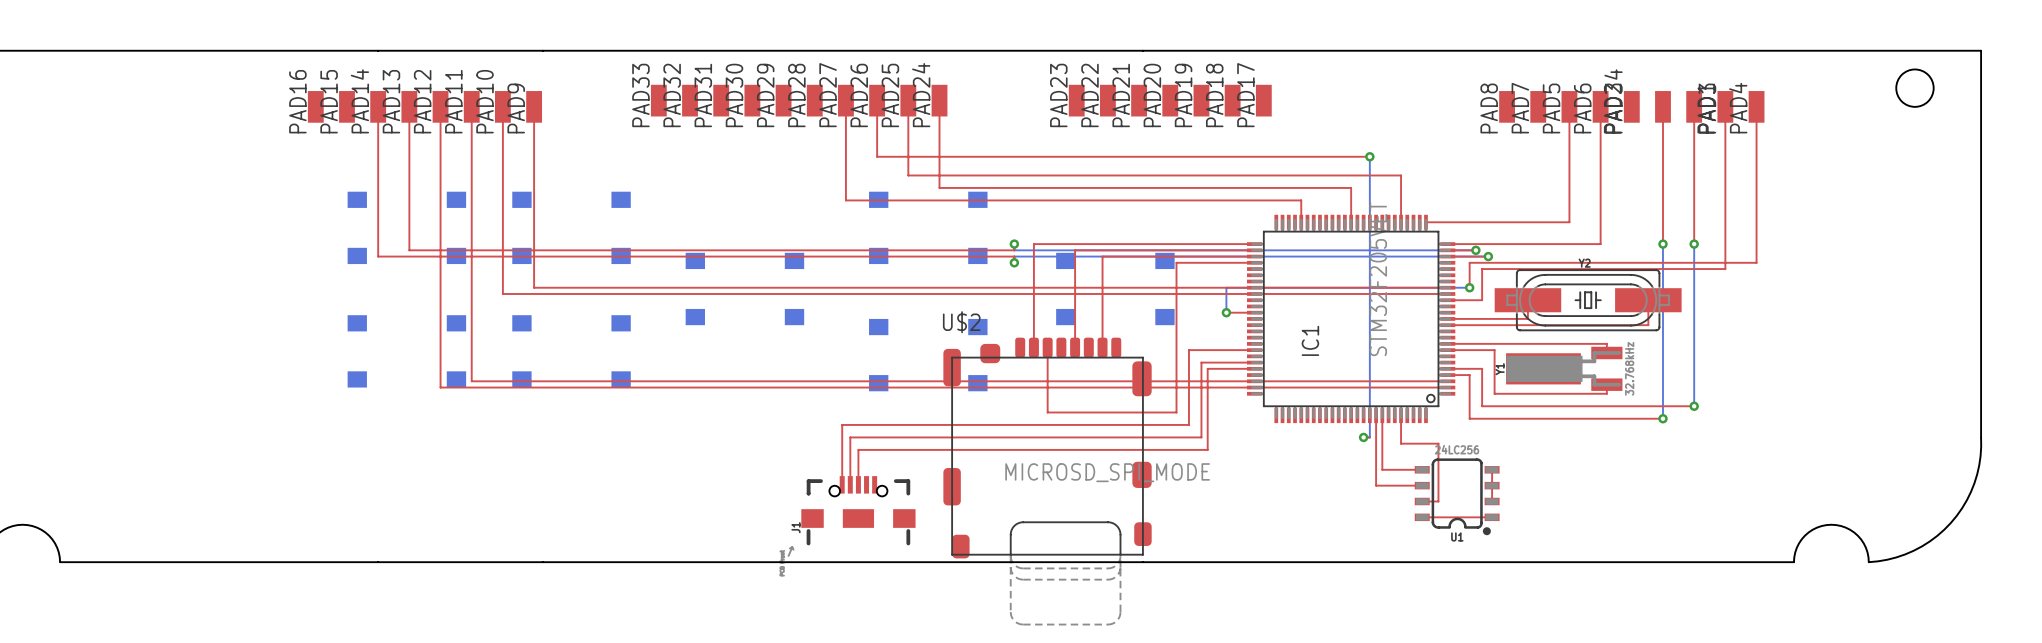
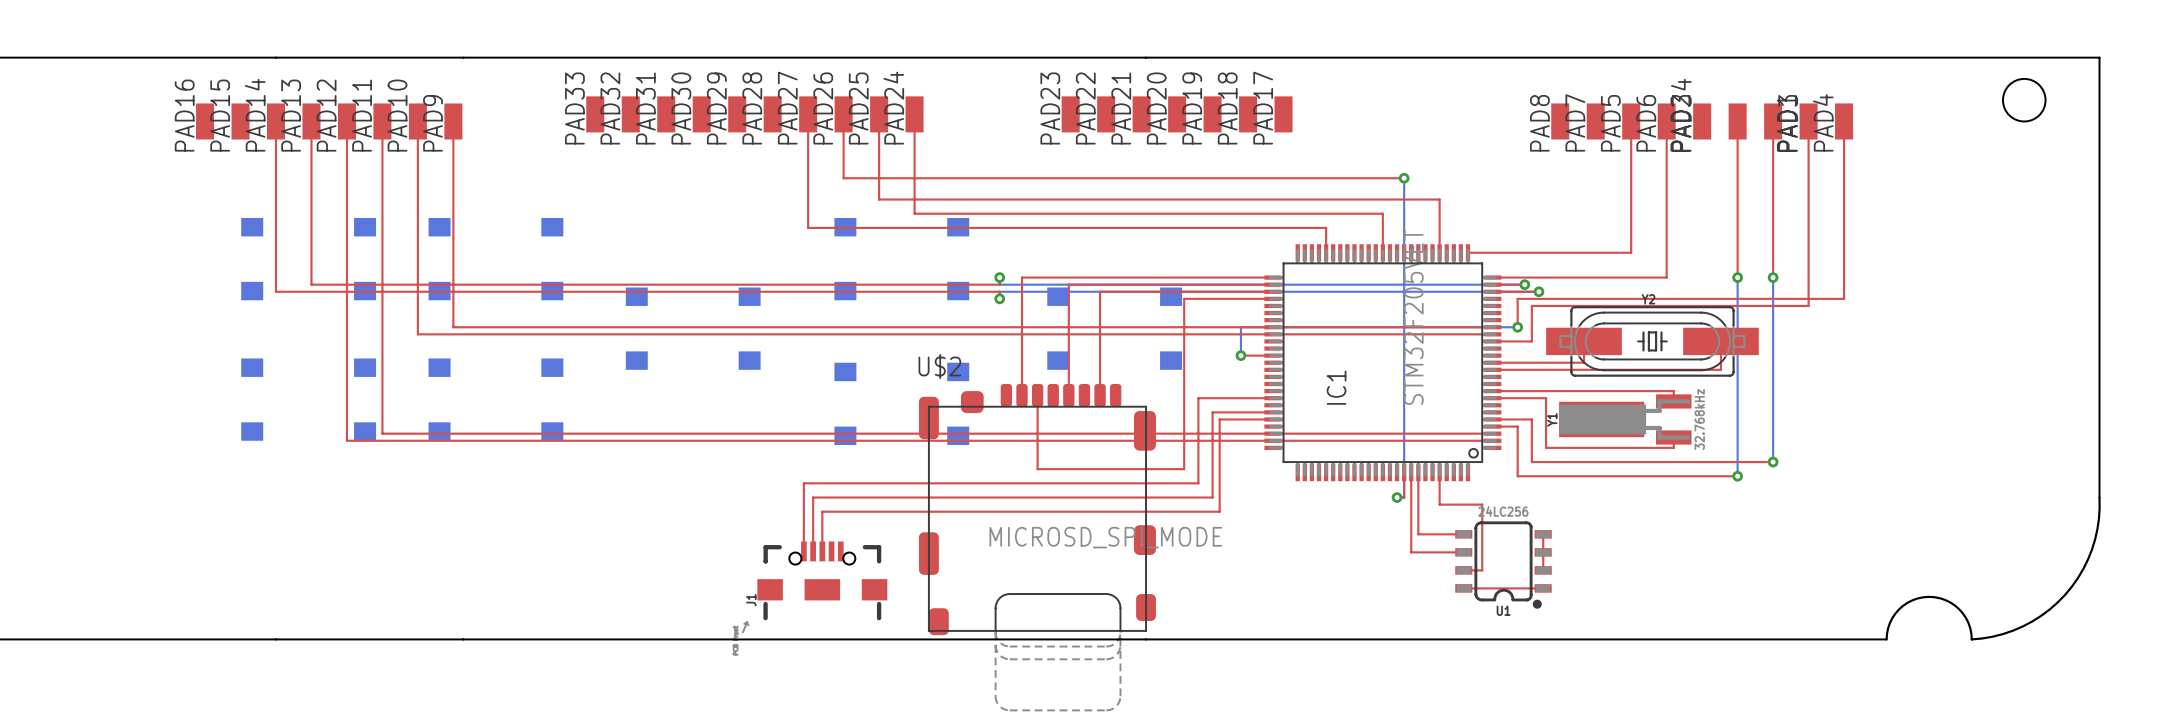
top track: none -> (1404, 472) (1404, 497)

